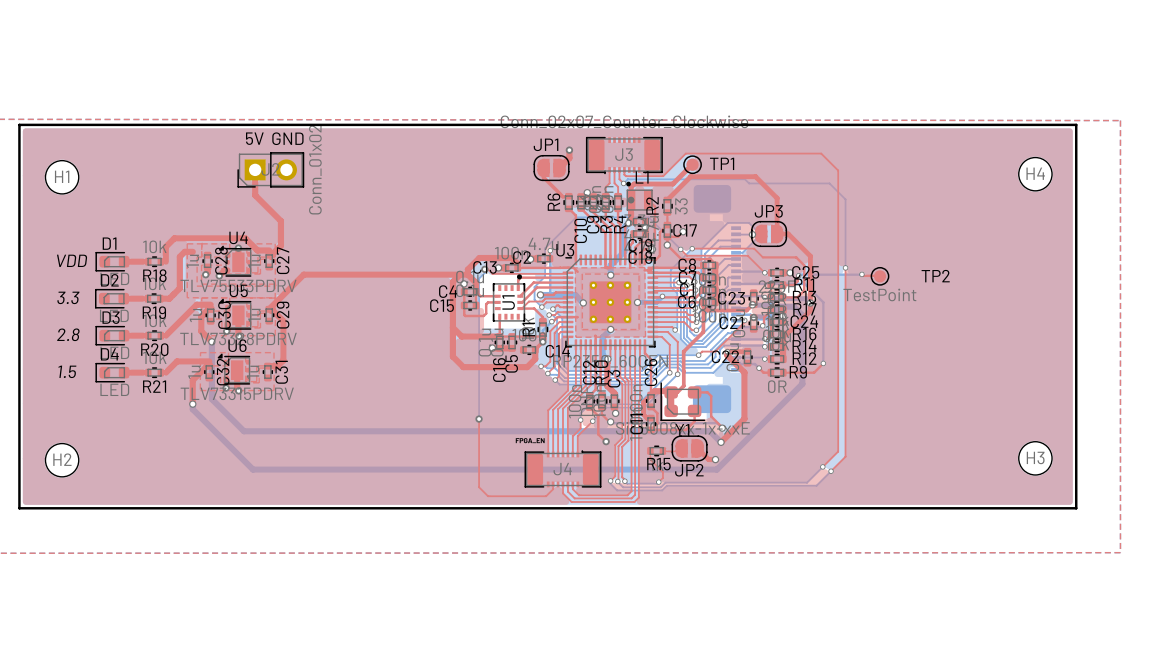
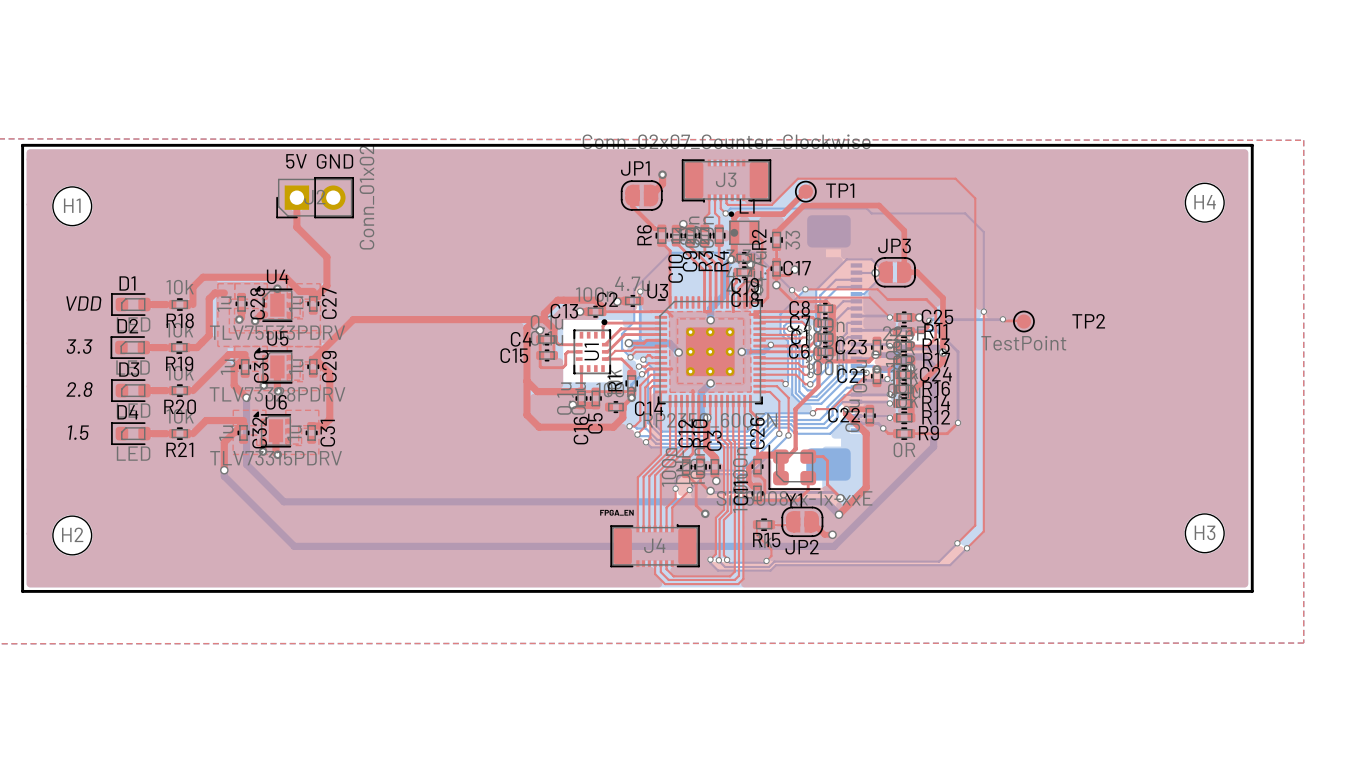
top track: (484, 269) (488, 269) (492, 273) (568, 272) -> none
bottom track: (484, 269) (484, 272) (479, 278) (479, 419) -> none
via: (484, 269) -> none
top track: (479, 419) (479, 487) (488, 496) (546, 496) (553, 489) (553, 484) -> none
via: (479, 419) -> none

